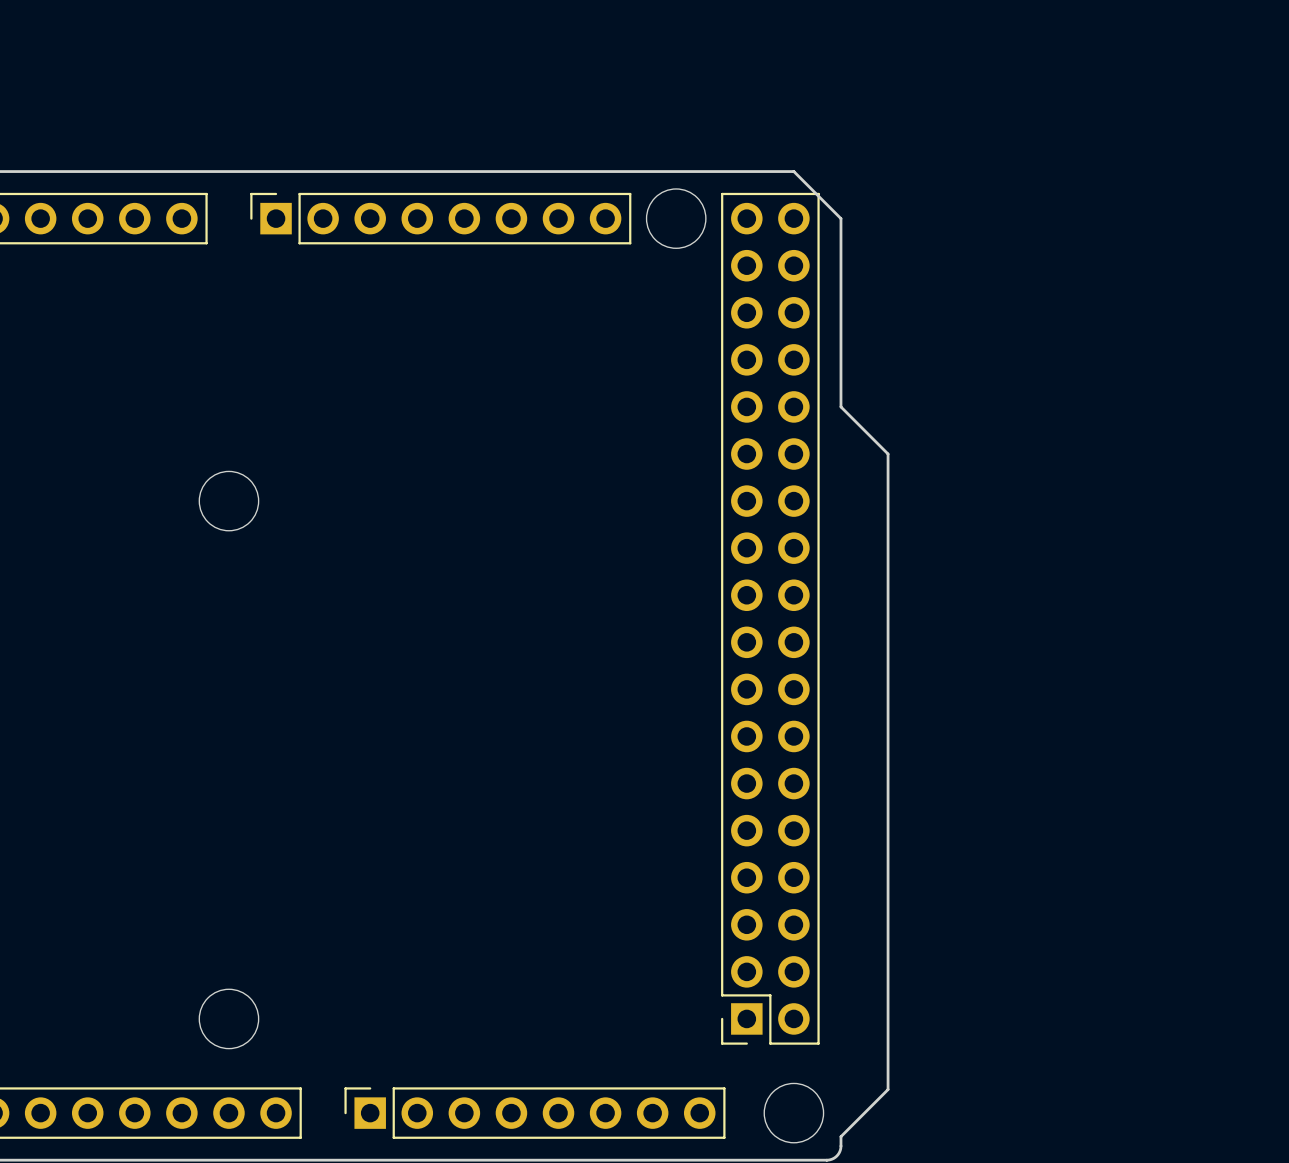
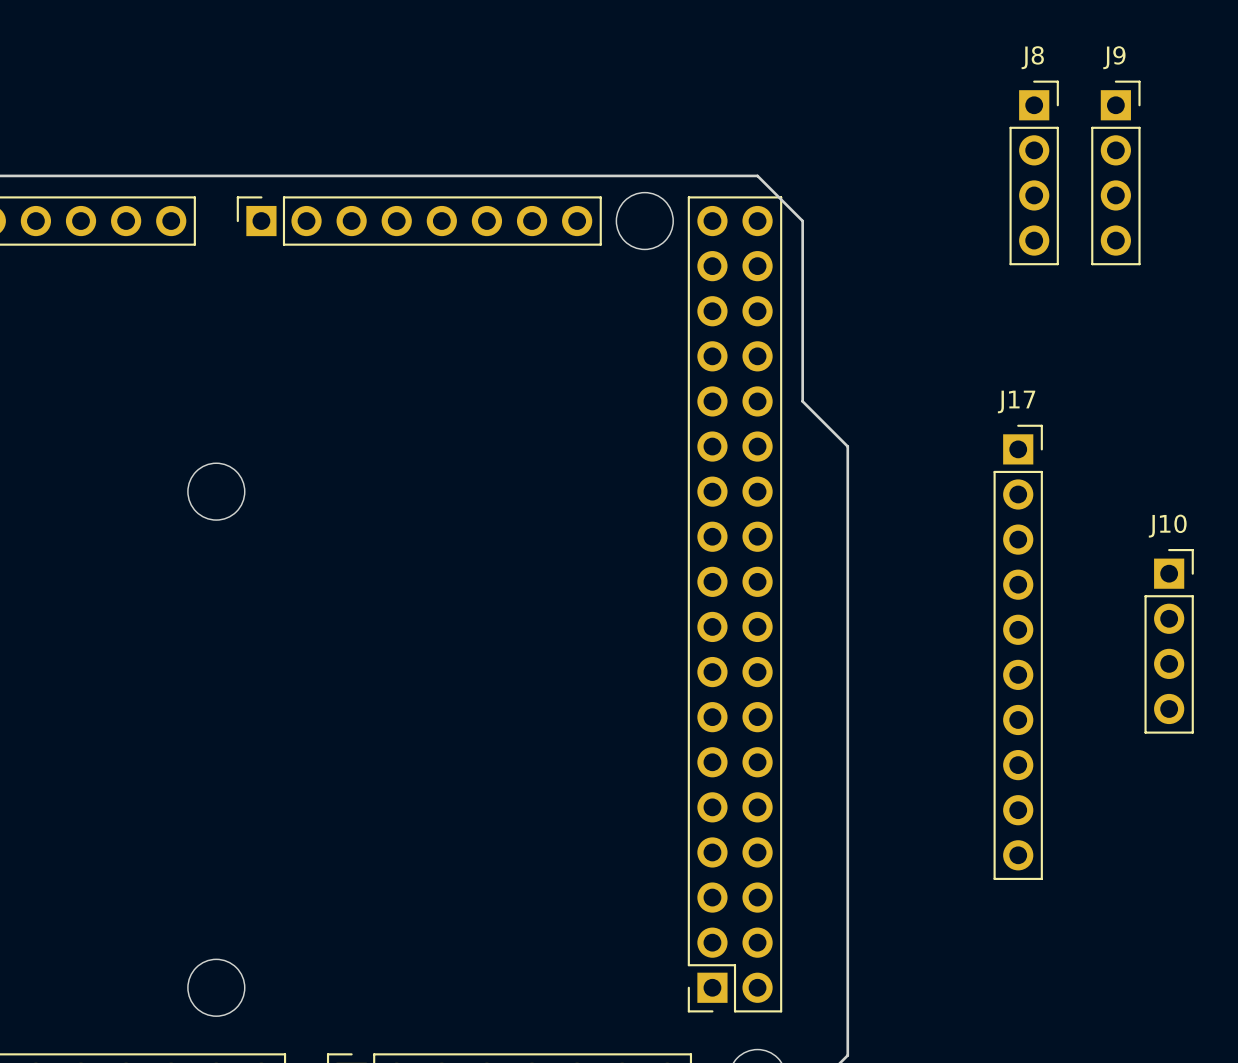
J8: none -> (1034, 172)
J9: none -> (1115, 172)
J10: none -> (1169, 641)
J17: none -> (1018, 652)

